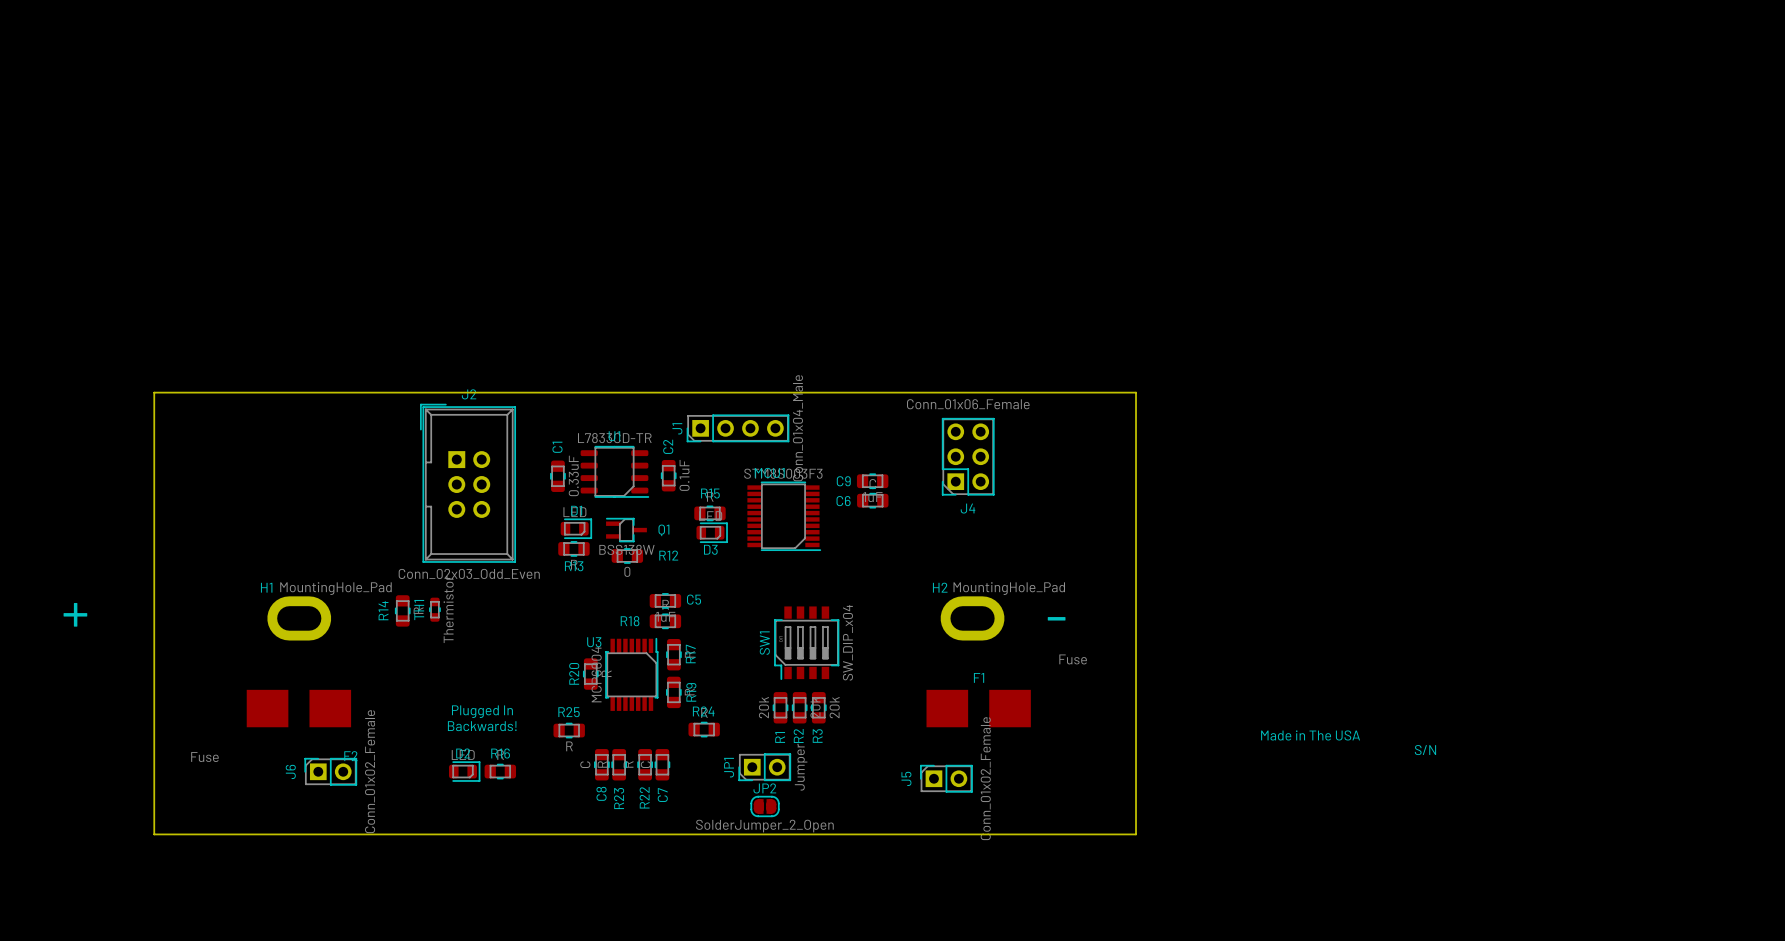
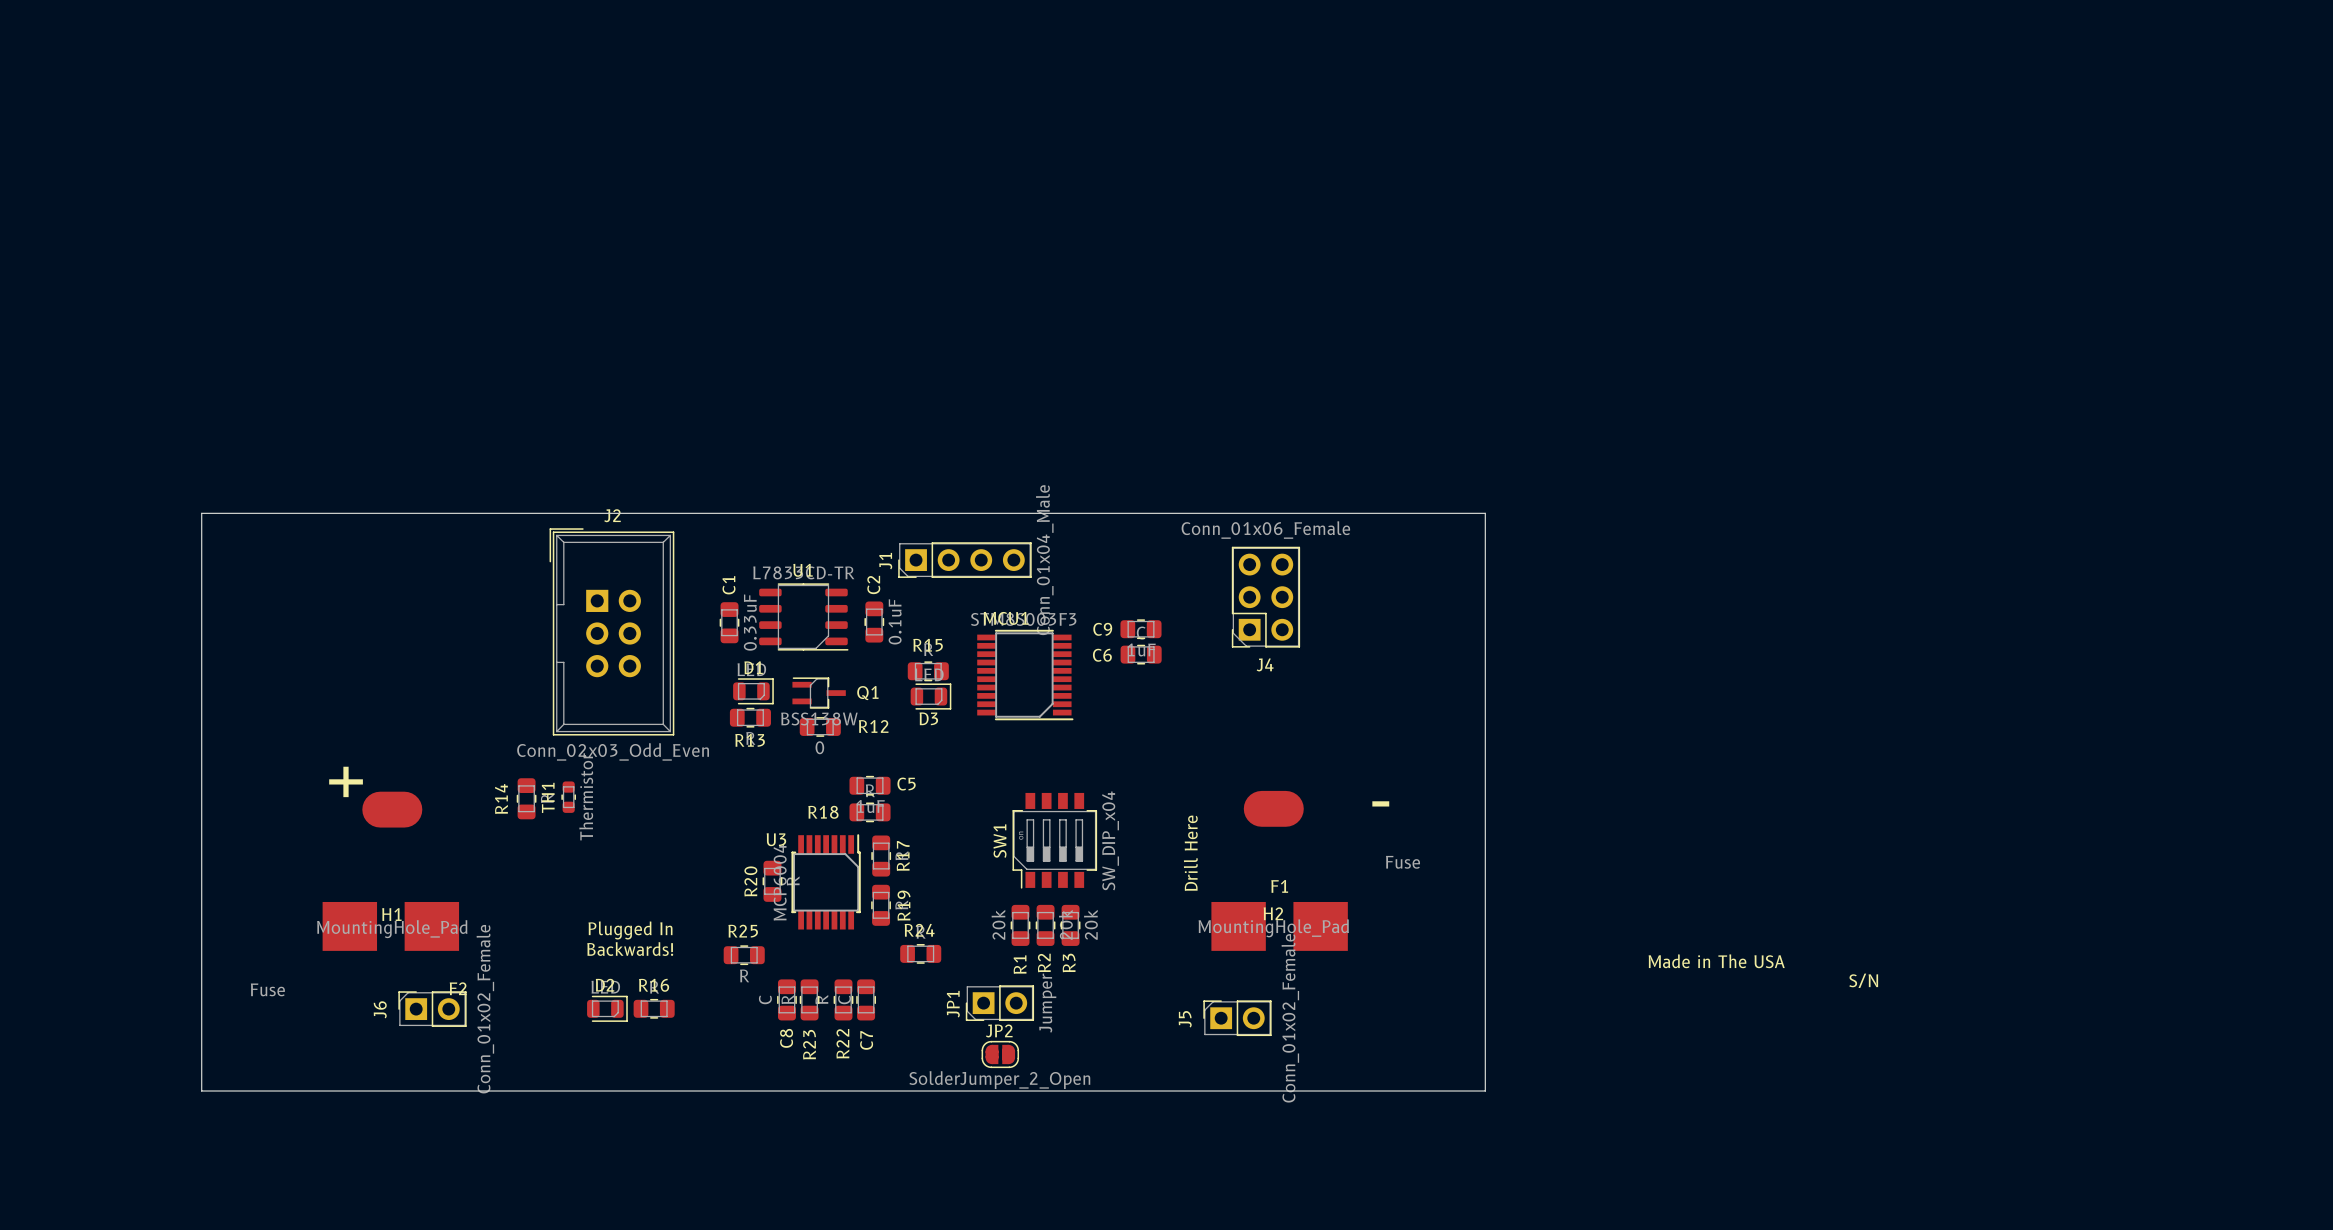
H1 name position: H1 (266, 587) -> H1 (391, 914)
H2 name position: H2 (940, 587) -> H2 (1273, 913)
H1 value position: MountingHole_Pad (335, 588) -> MountingHole_Pad (392, 929)
H2 value position: MountingHole_Pad (1009, 588) -> MountingHole_Pad (1273, 928)
H1 footprint: [267, 596, 332, 641] -> [362, 791, 423, 828]
H2 footprint: [940, 596, 1005, 641] -> [1243, 790, 1304, 827]
text position: + (75, 614) -> + (346, 781)

